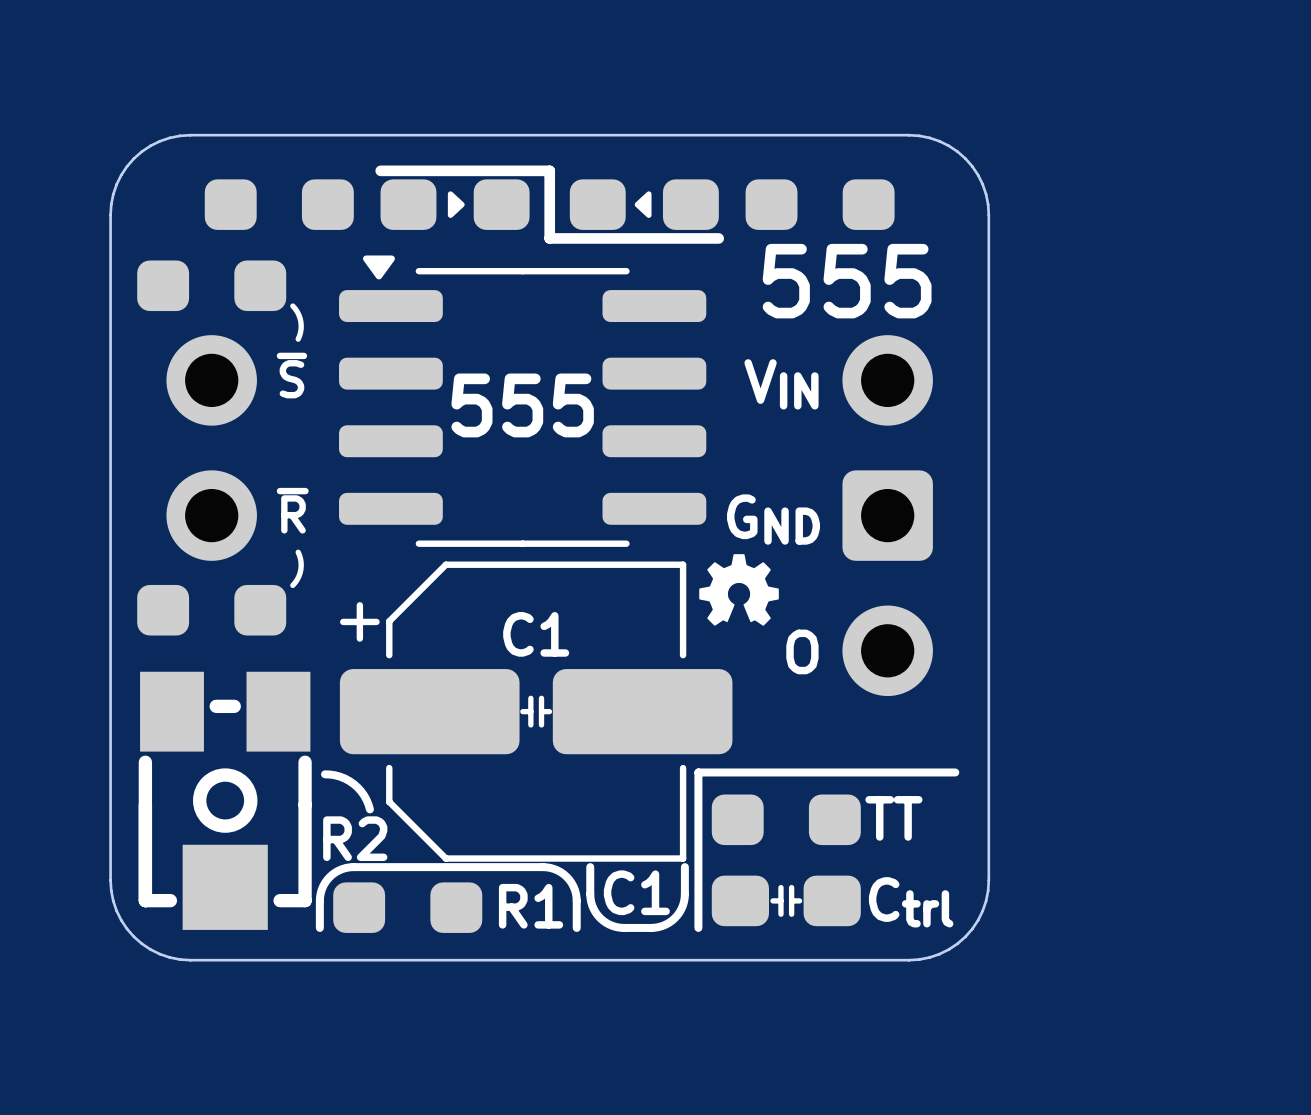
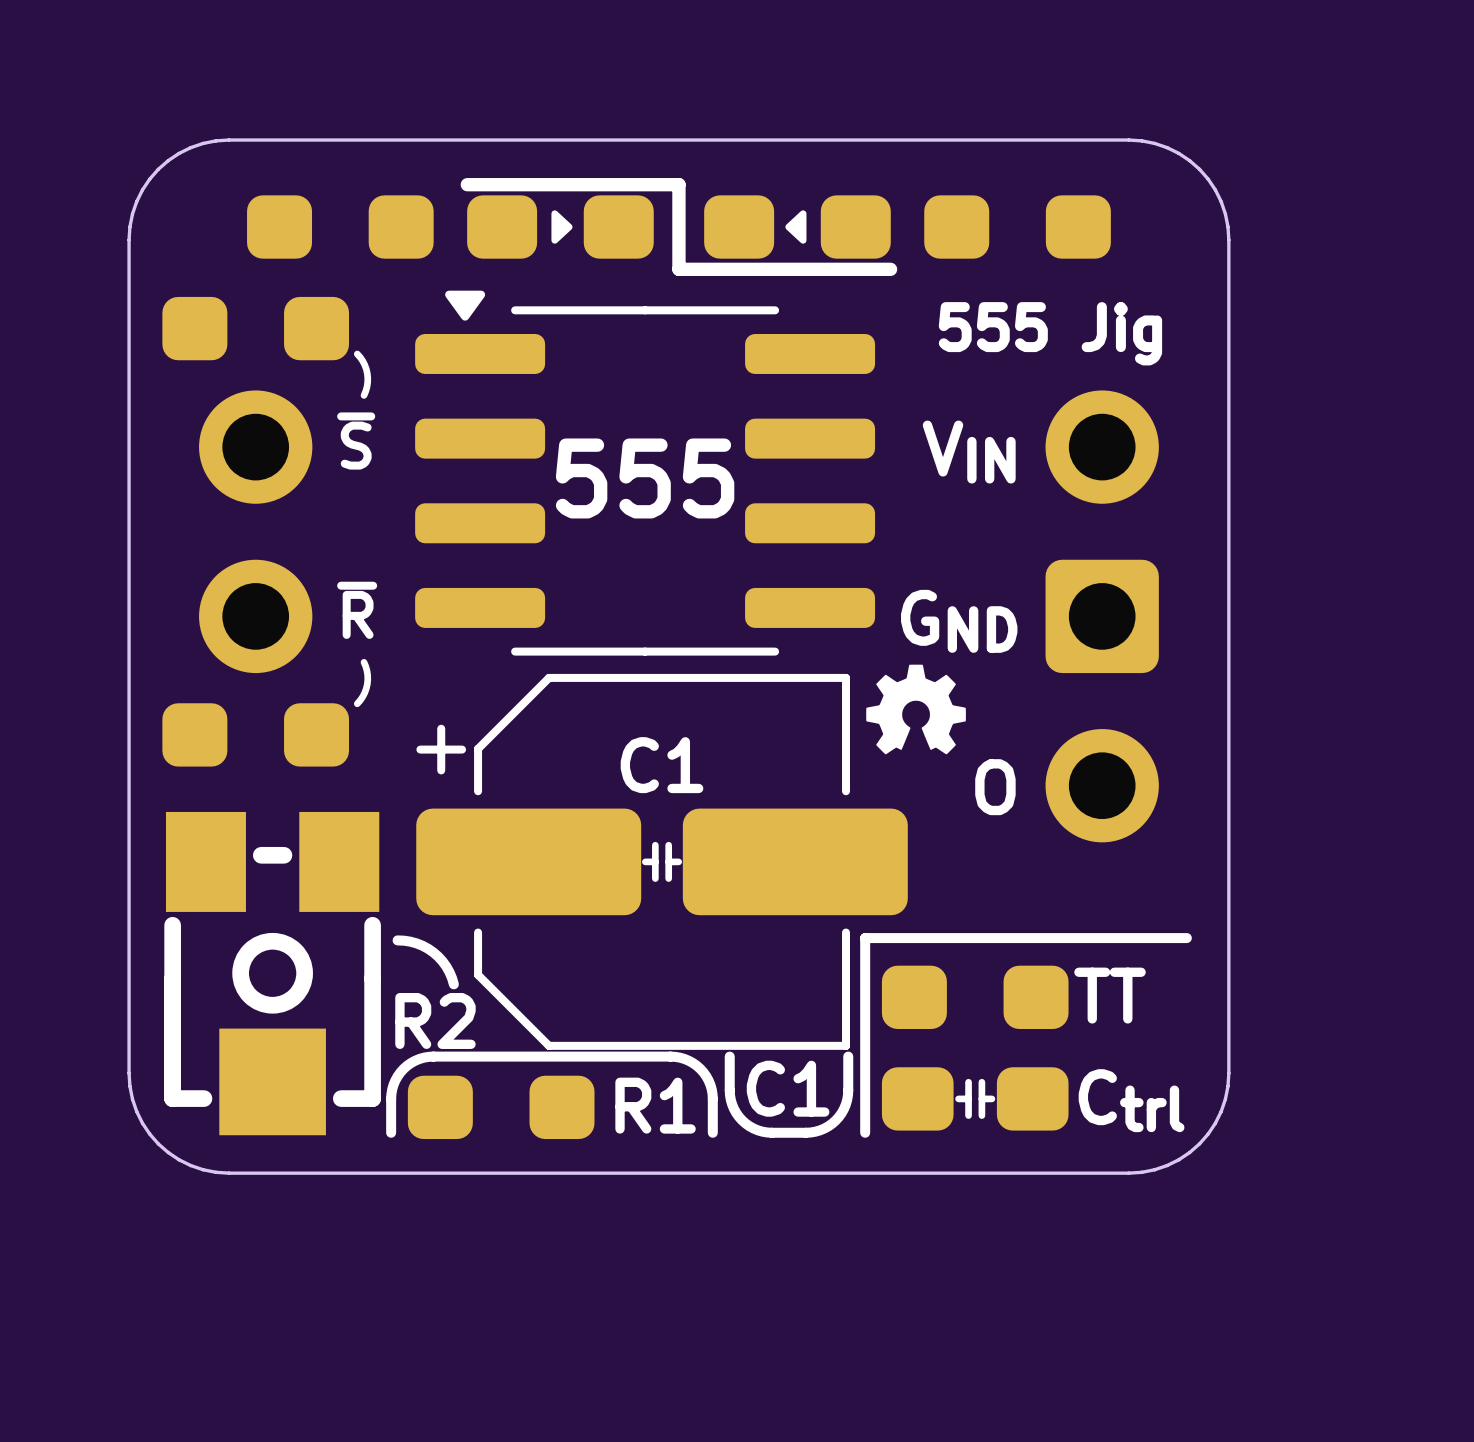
text: 555 (847, 281) -> 555 Jig (1050, 333)

